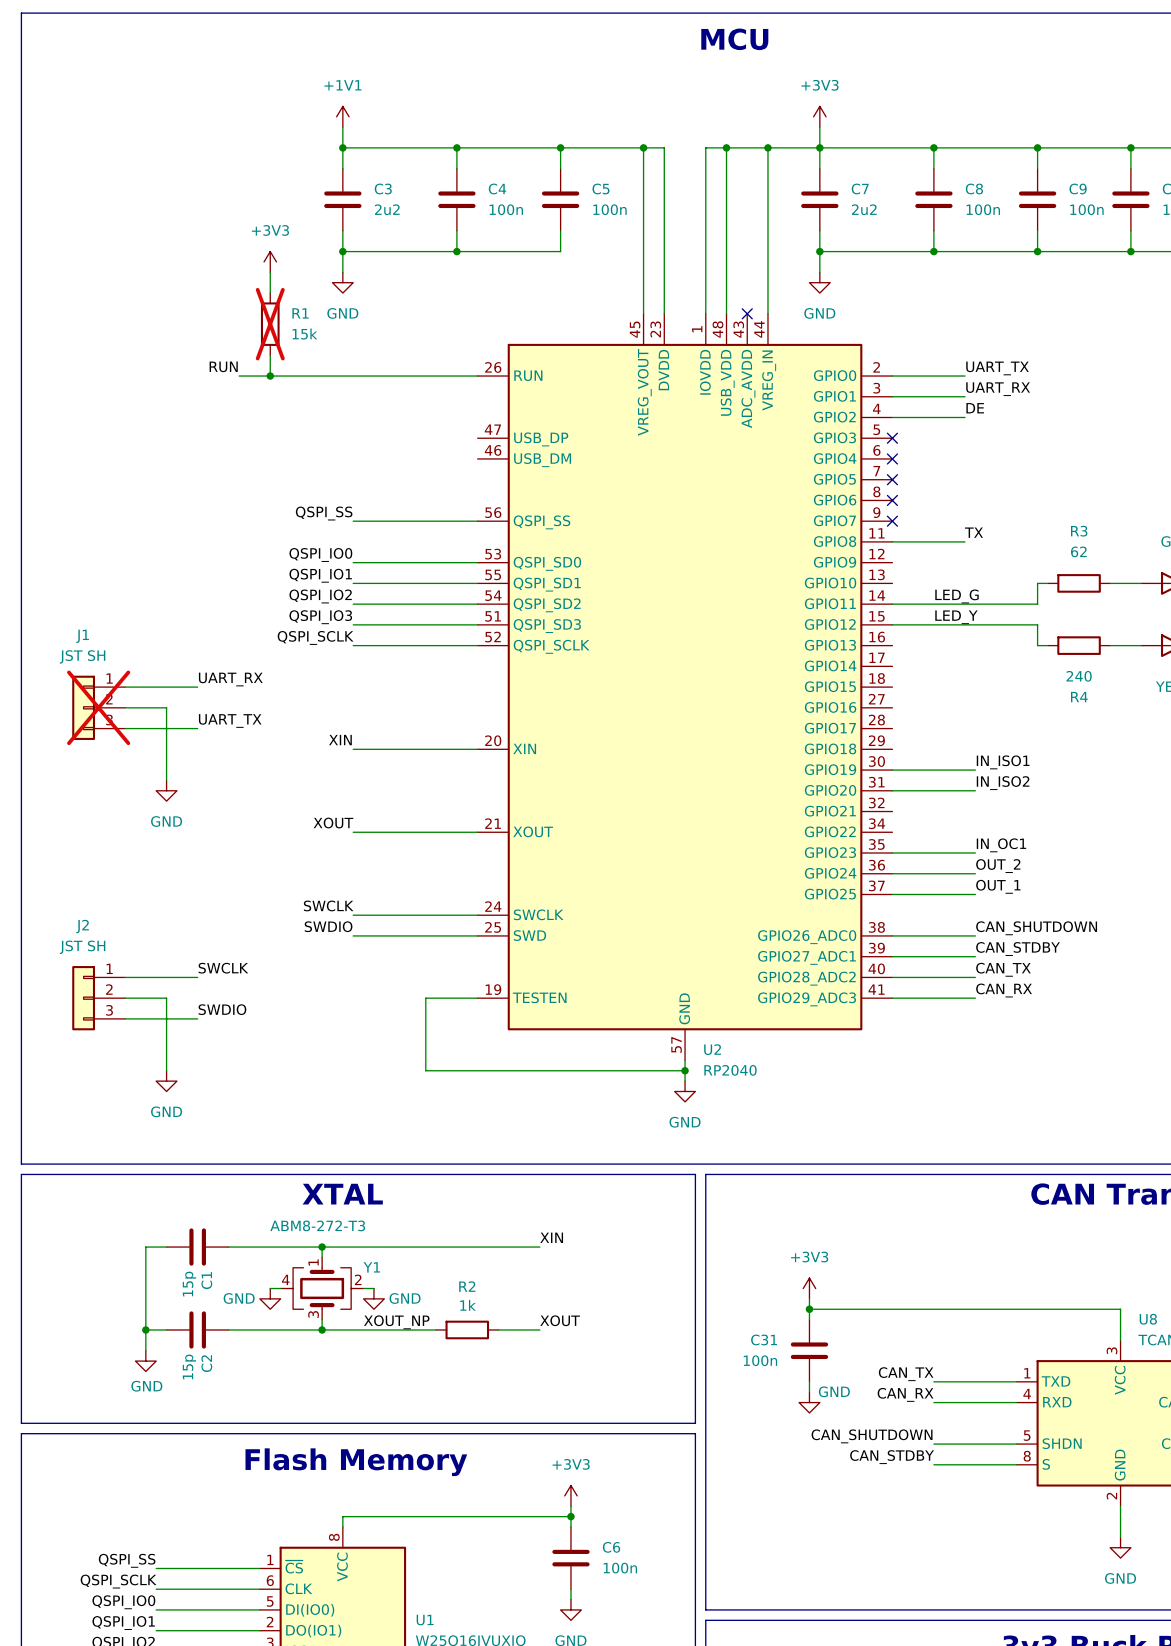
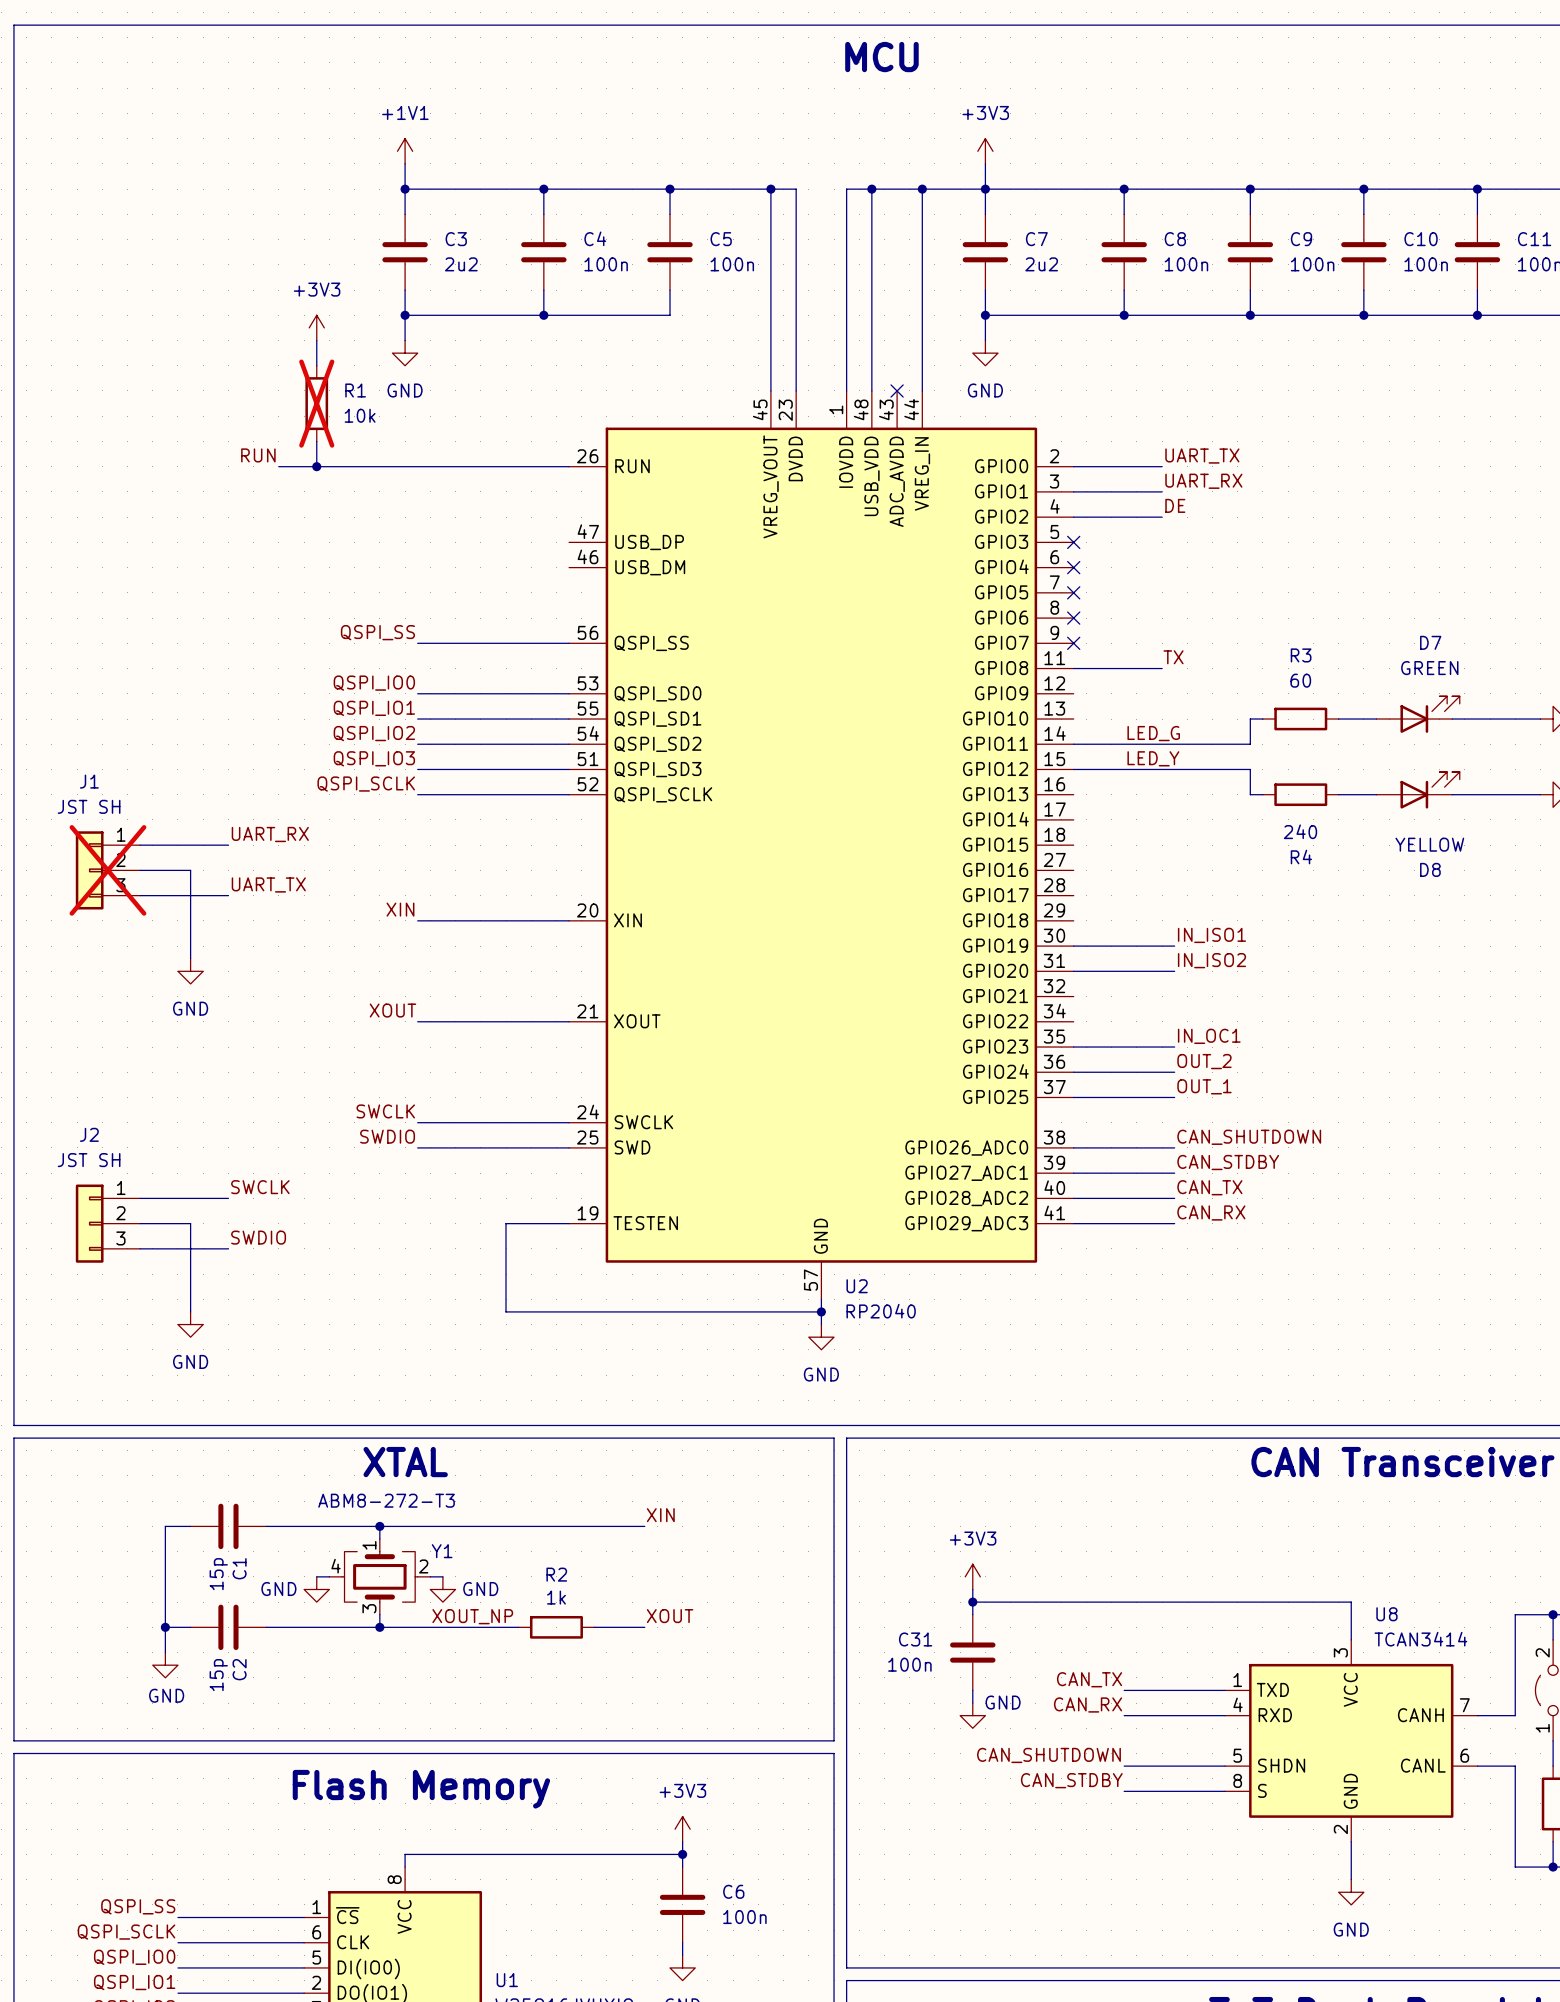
R1 value: 15k (304, 334) -> 10k (360, 415)
R3 value: 62 (1078, 551) -> 60 (1300, 680)

